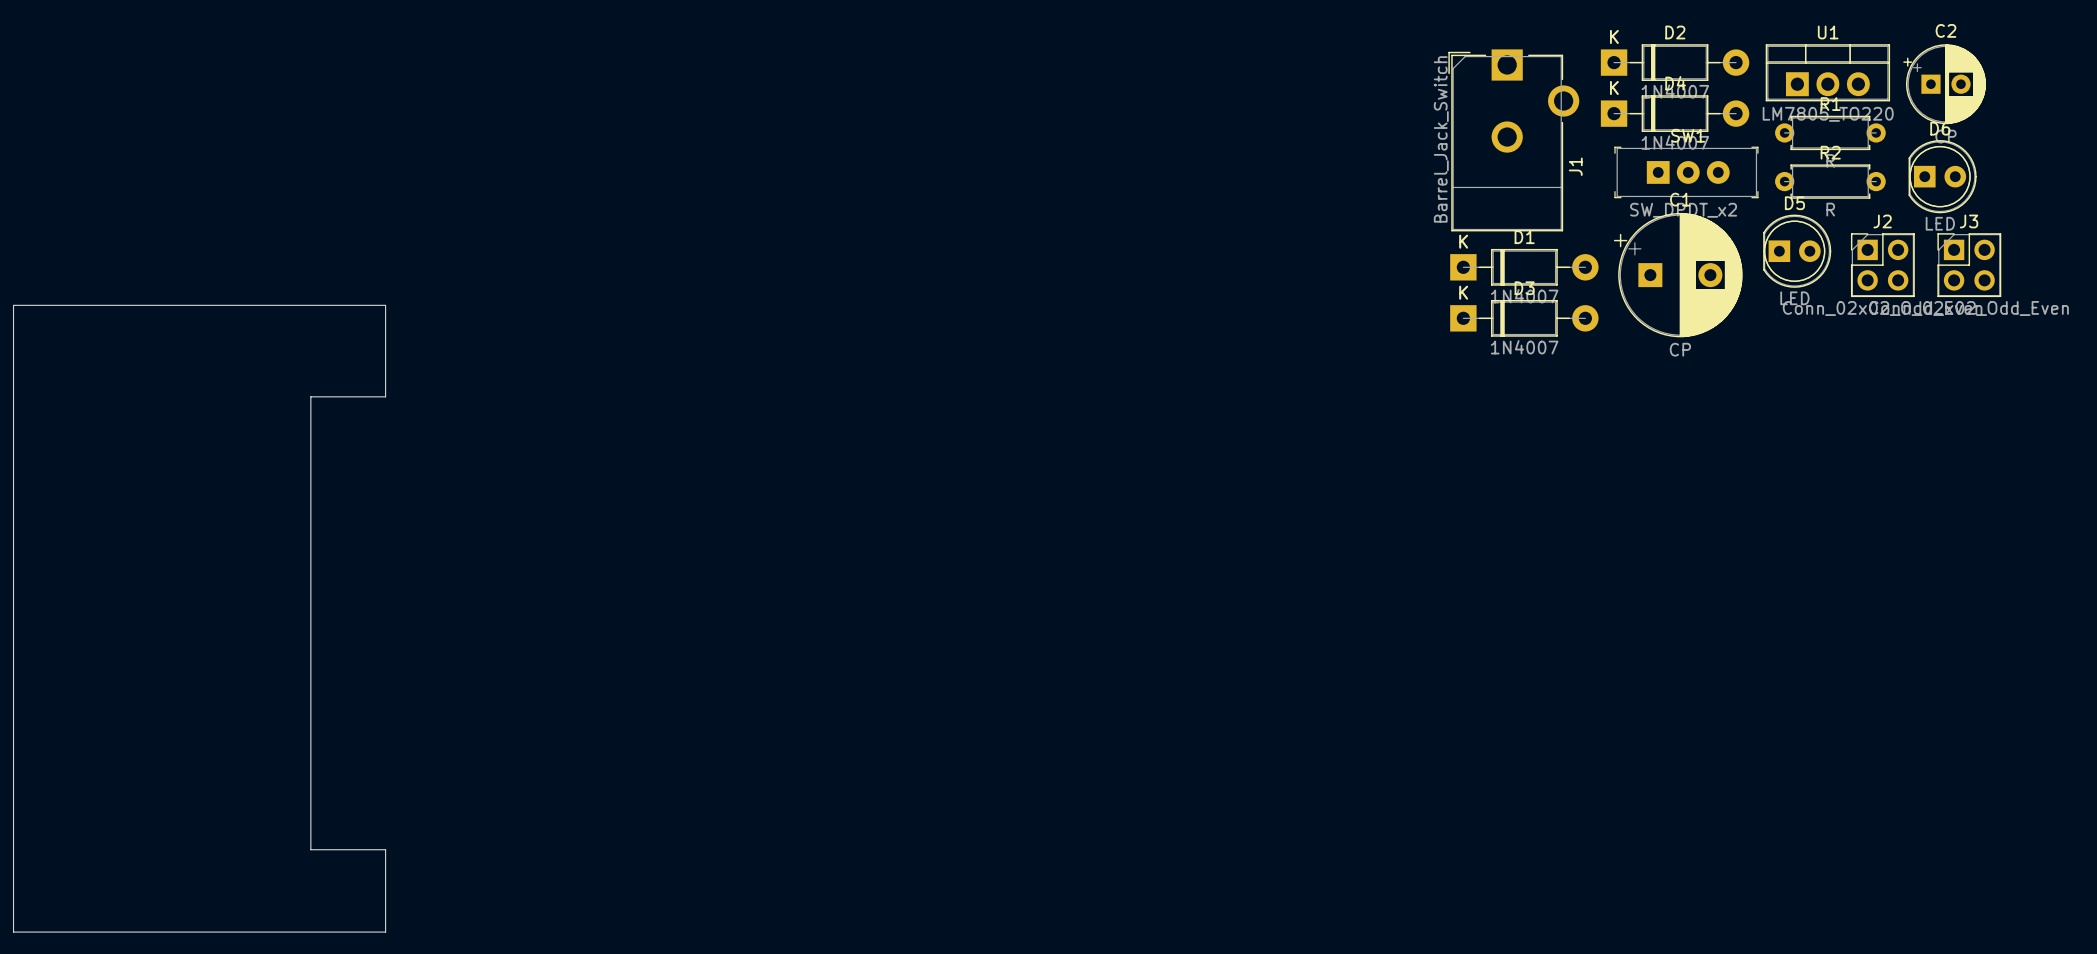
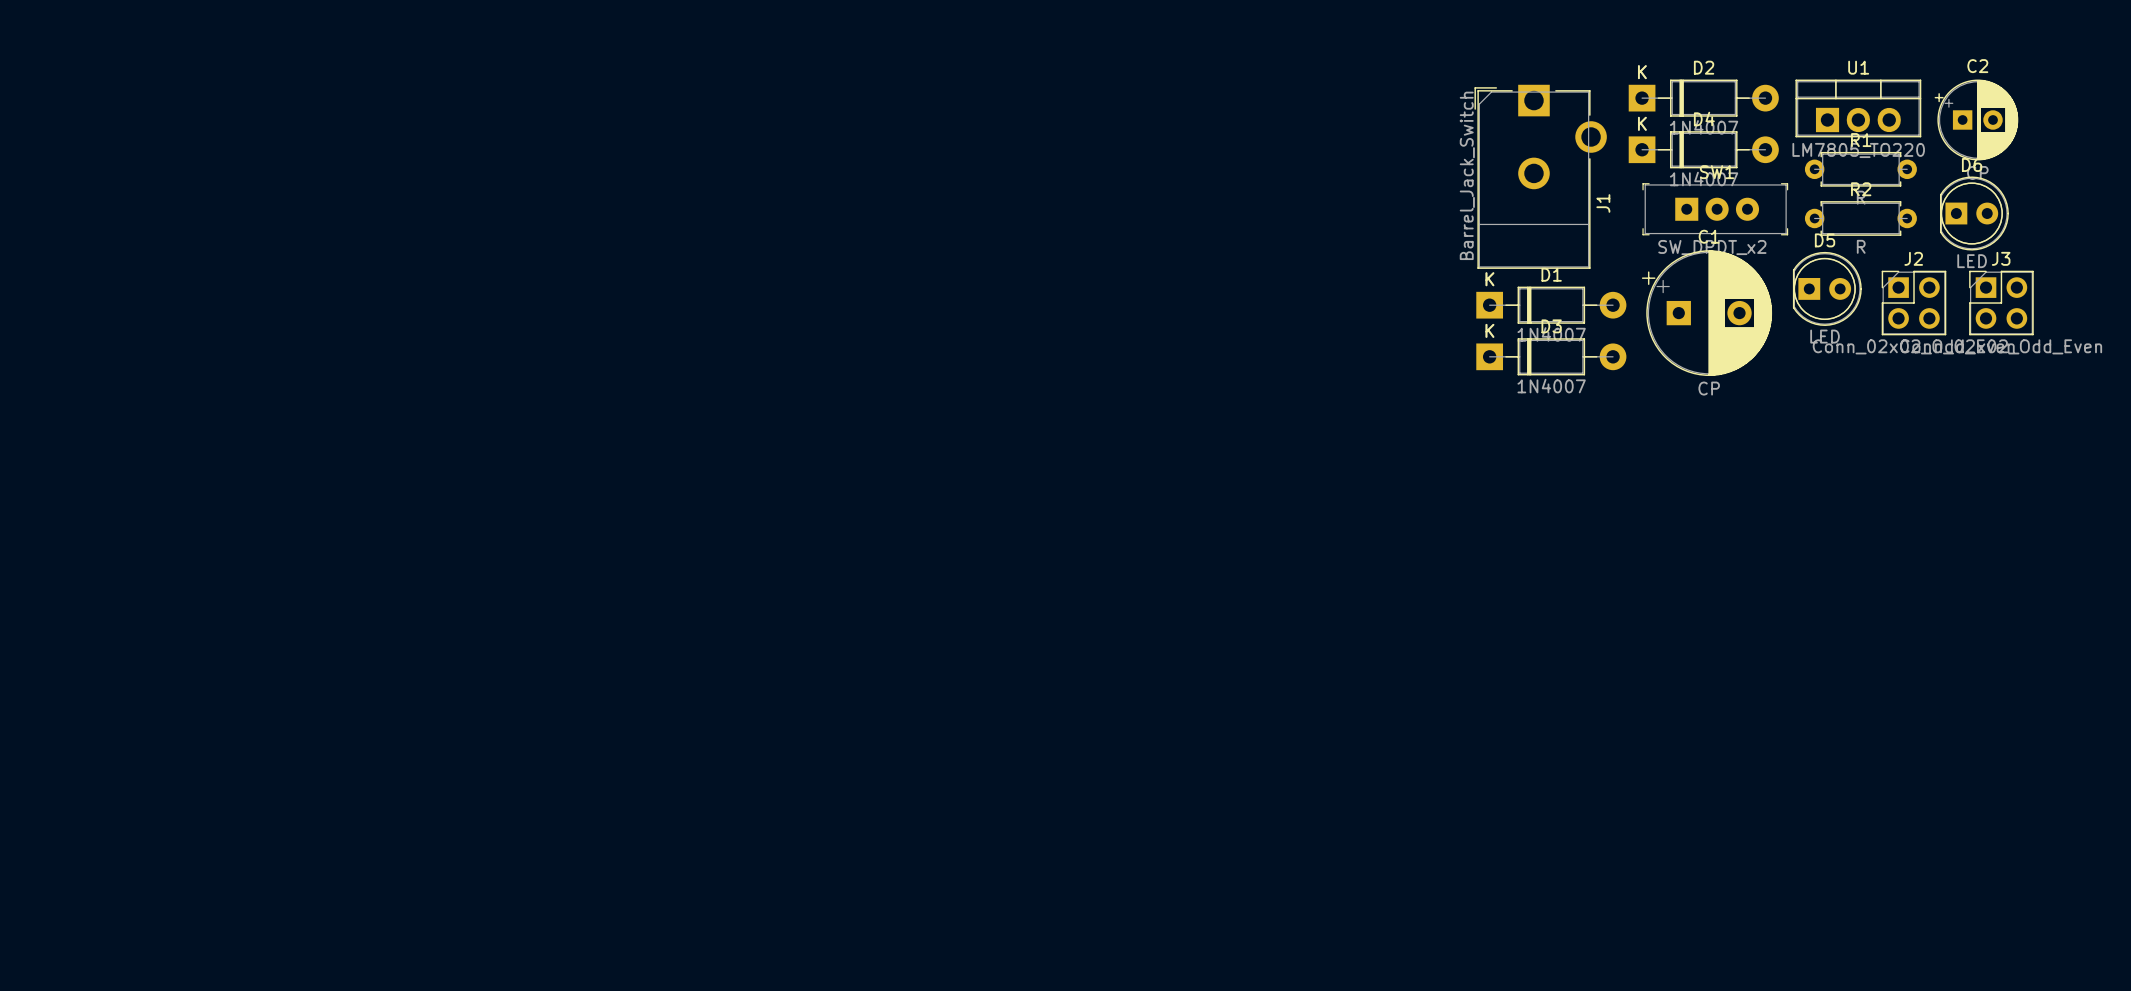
board edge: (13, 305) (385, 305) (385, 396) (310, 396) (310, 849) (385, 849) (385, 932) (13, 932) (13, 305) -> none

